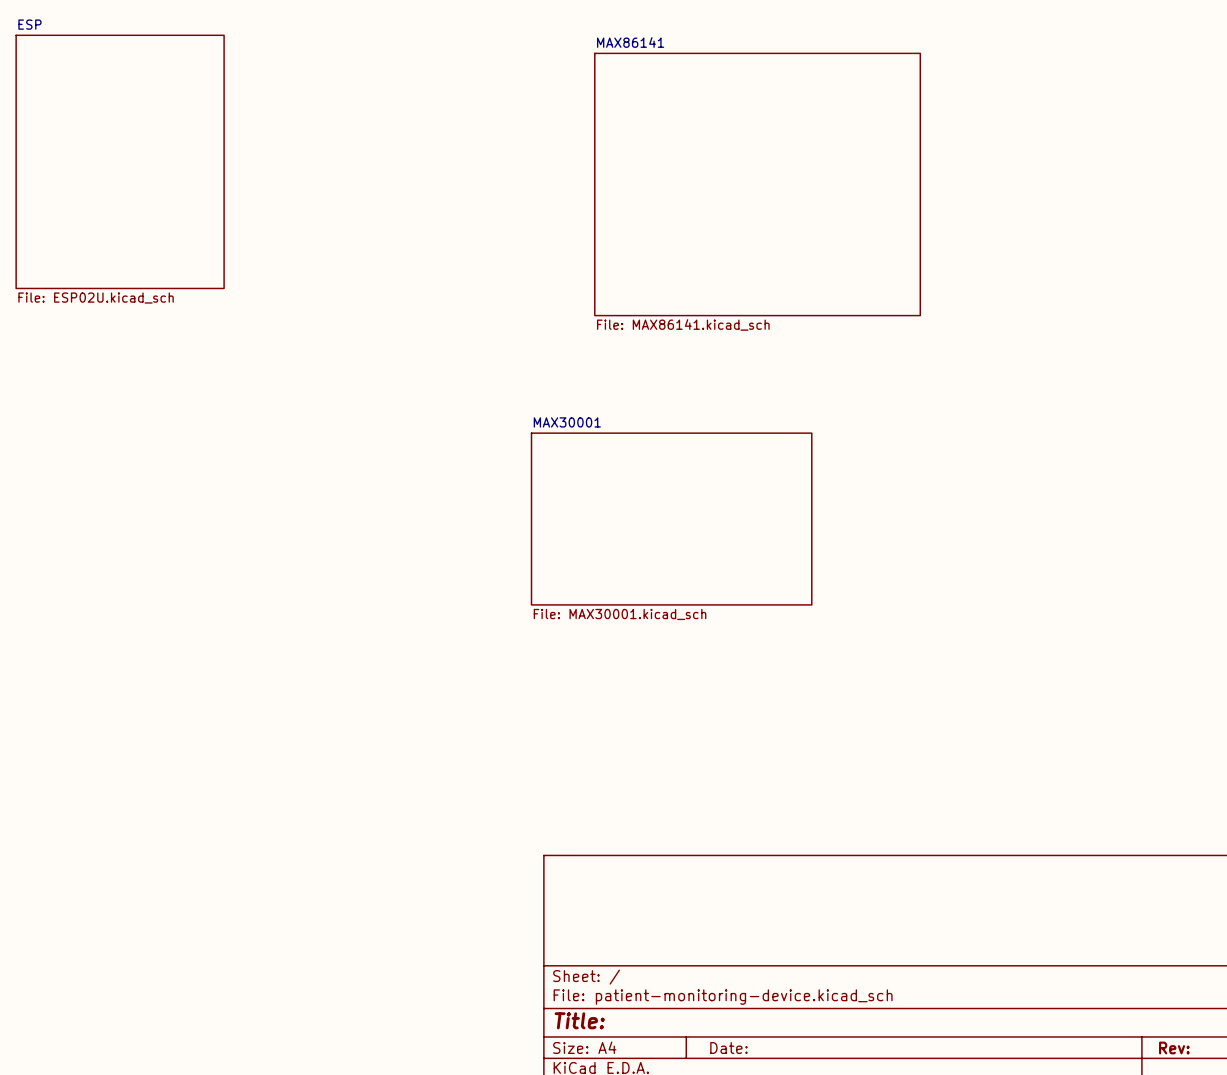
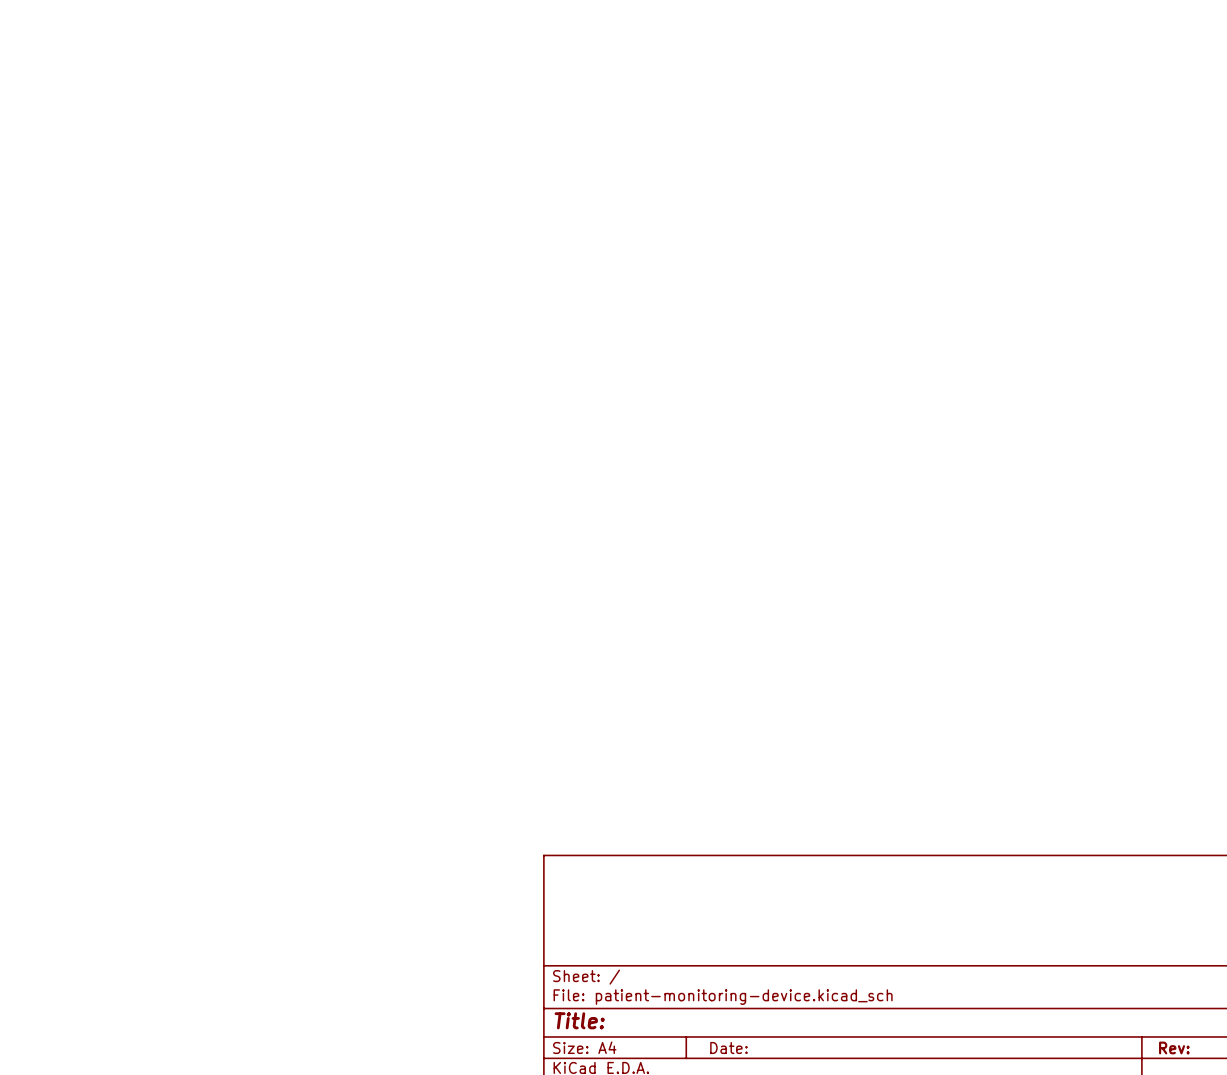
sheet ESP: File: ESP02U.kicad_sch (120, 161) -> none
sheet MAX86141: File: MAX86141.kicad_sch (757, 184) -> none
sheet MAX30001: File: MAX30001.kicad_sch (671, 519) -> none

